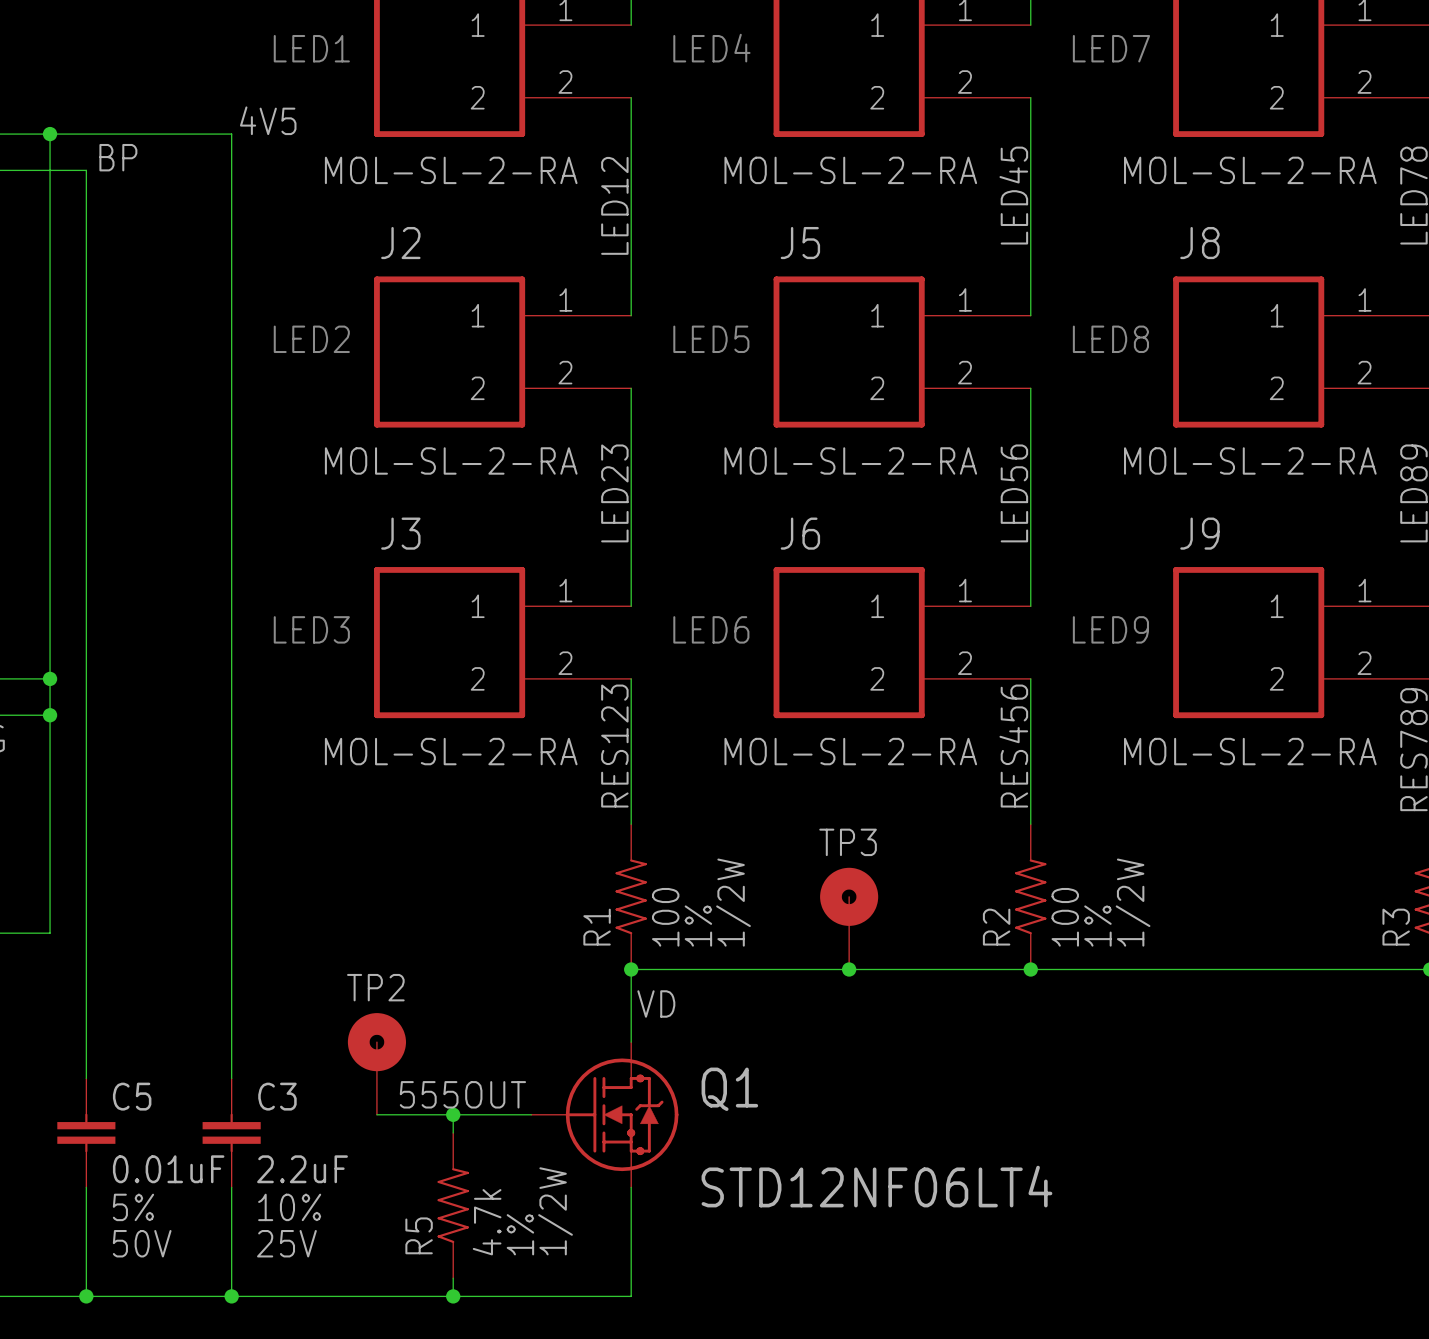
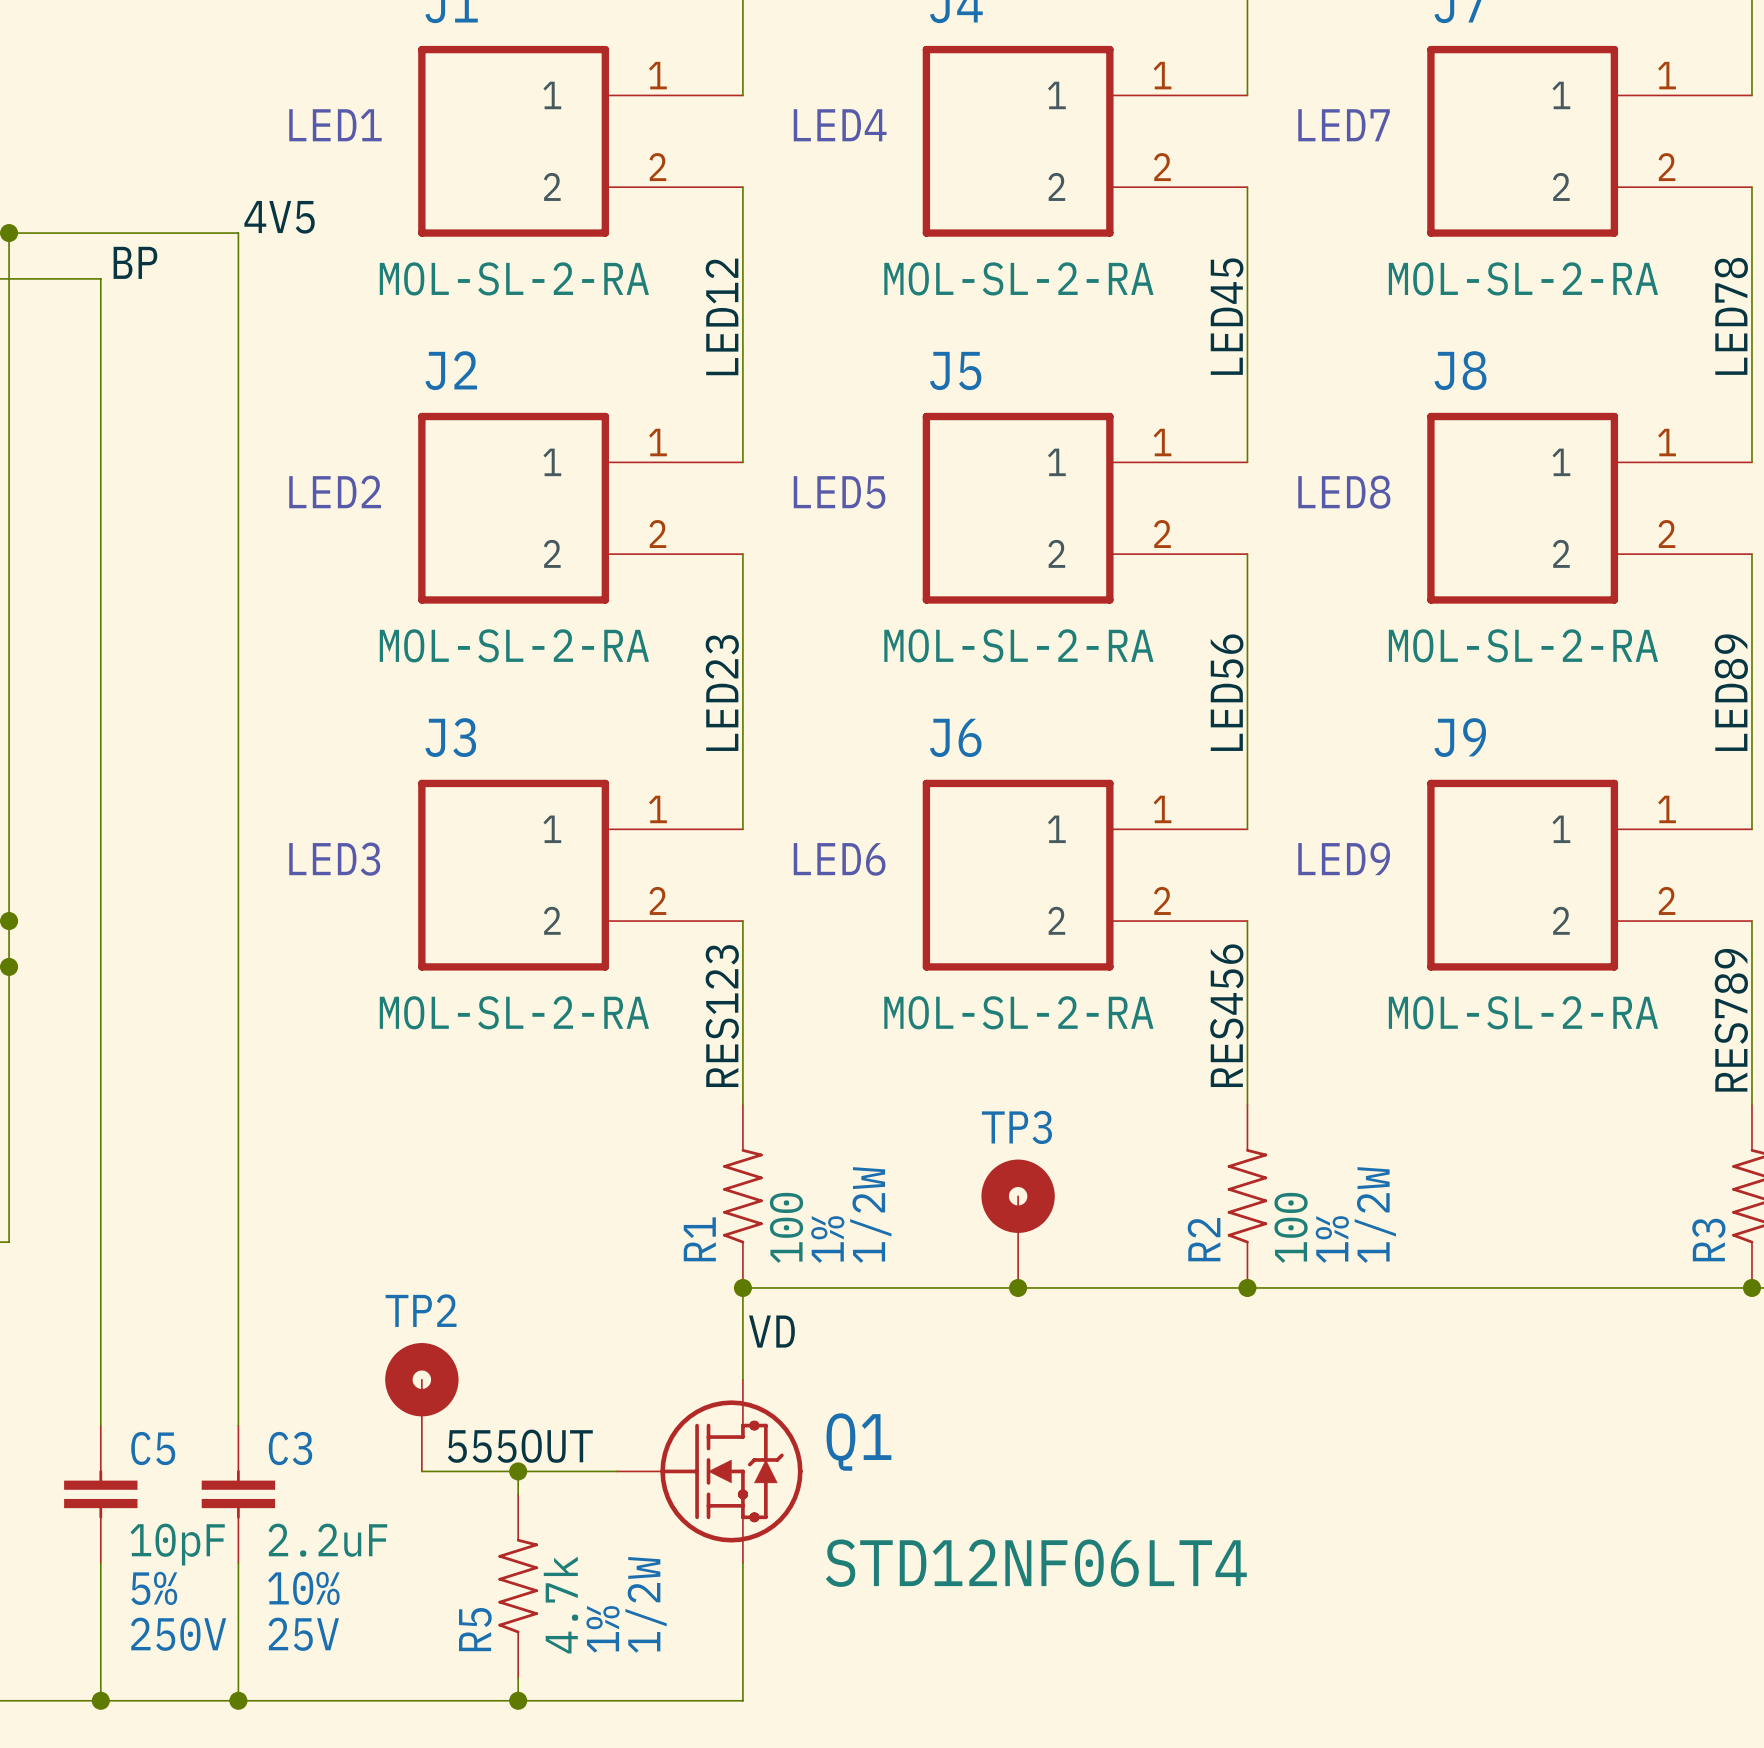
label position: BP (118, 157) -> BP (135, 262)
wire: (86, 170) (86, 1078) -> (54, 278) (100, 278) (100, 1425)
C5 position: (86, 1132) -> (100, 1494)
C5 value: 0.01uF (168, 1169) -> 10pF (177, 1544)
wire: (86, 1187) (86, 1296) -> (100, 1563) (100, 1700)
C5 text: 50V (142, 1243) -> 250V (178, 1634)
junction position: (86, 1296) -> (100, 1700)

